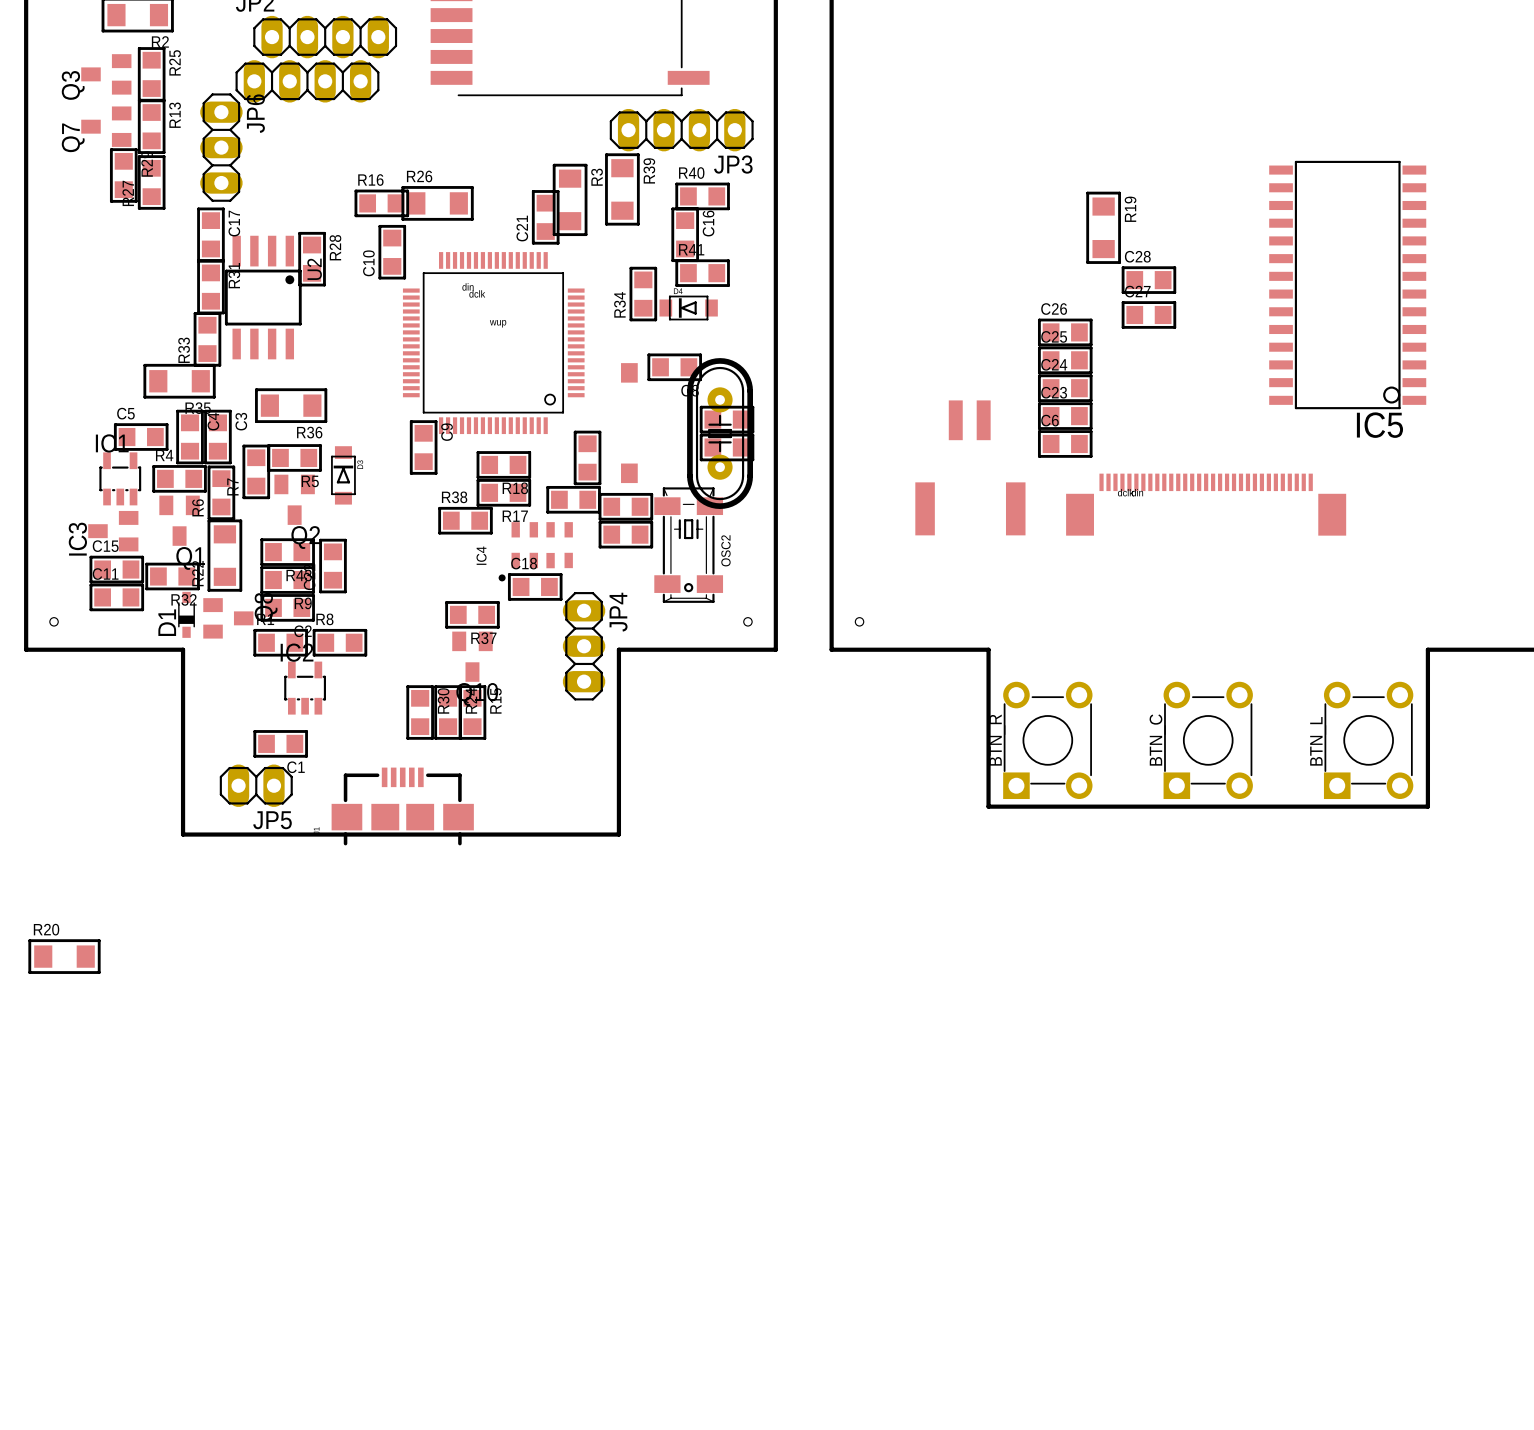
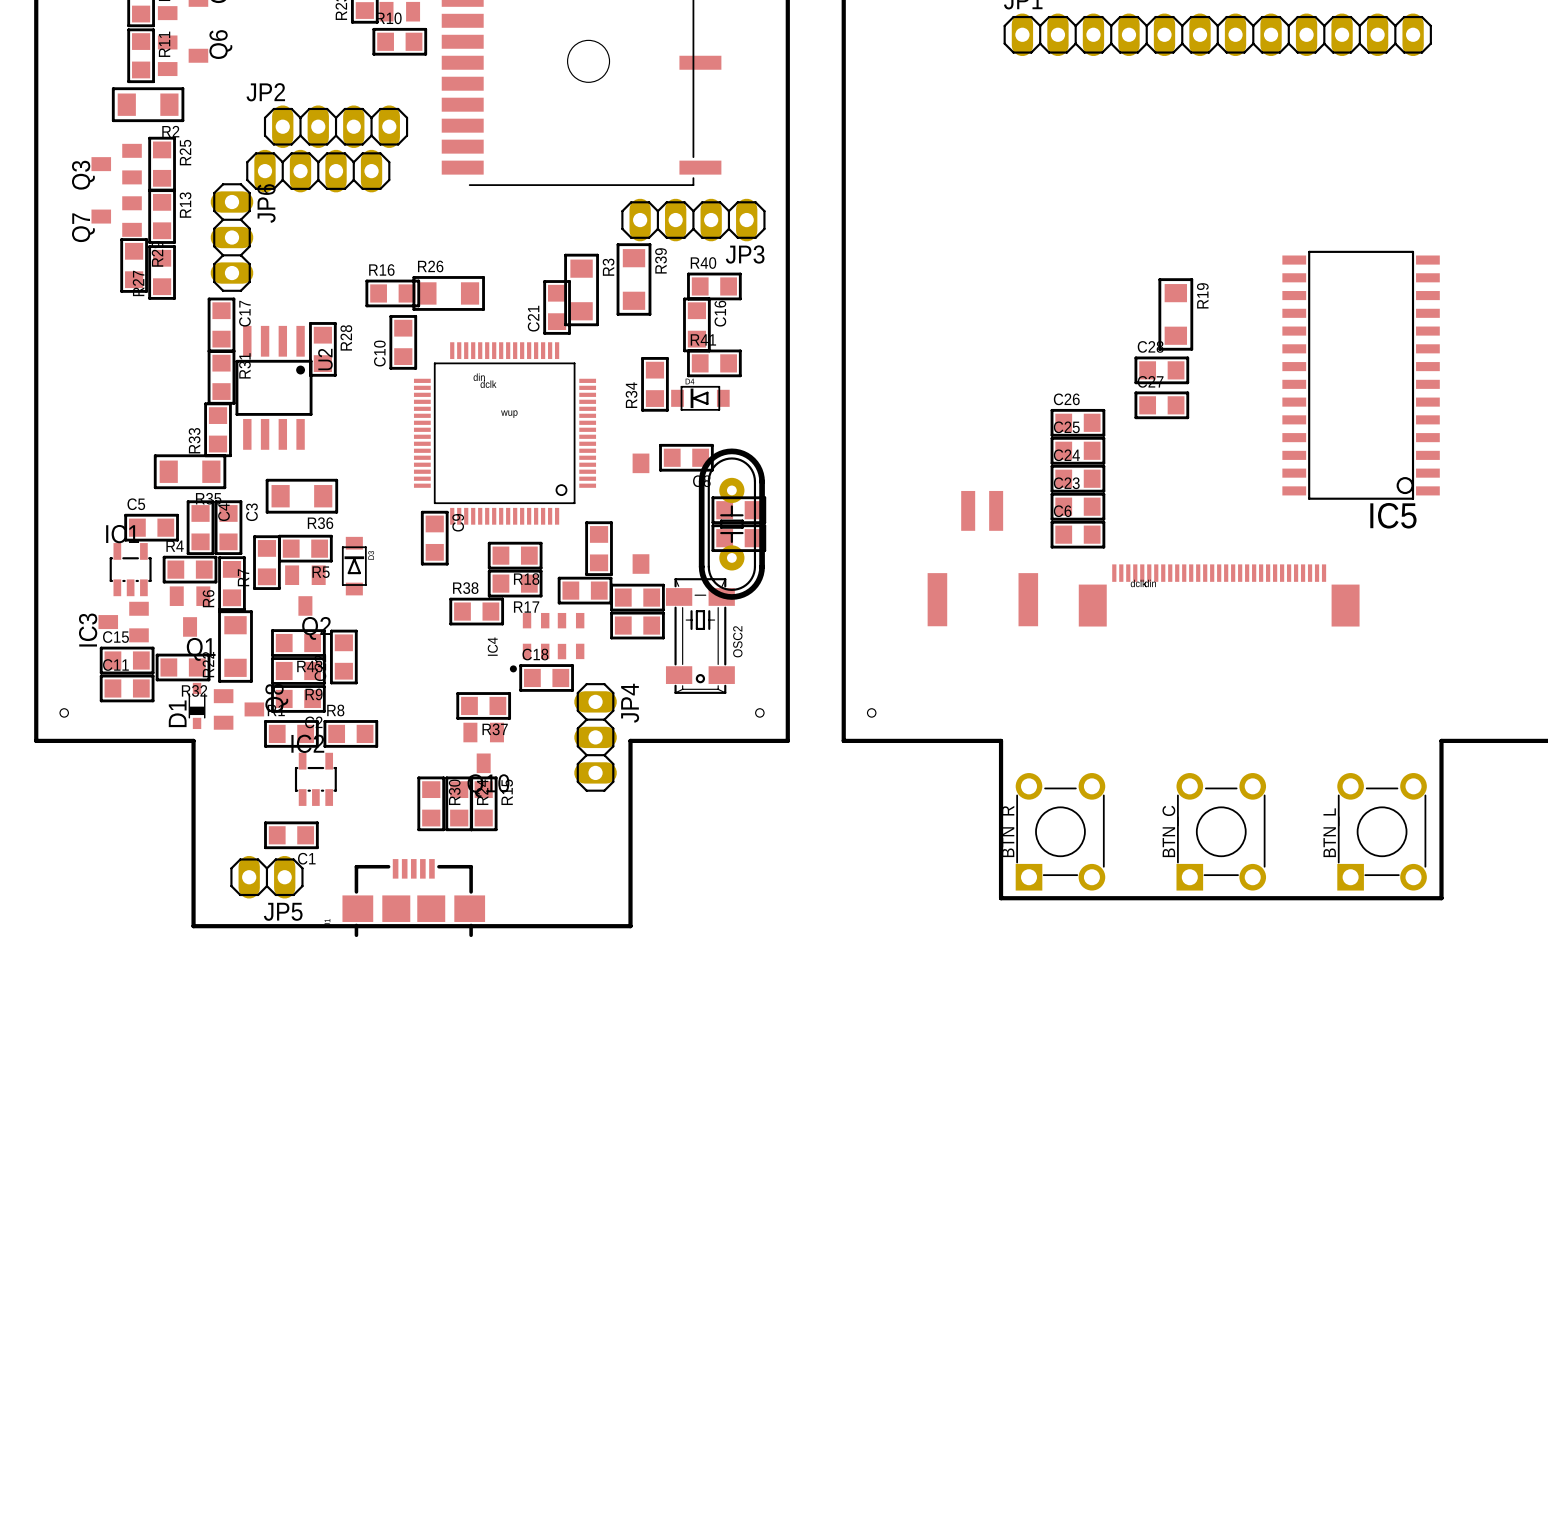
R19 position: (1103, 227) -> (1175, 314)
R20: (64, 956) -> none

